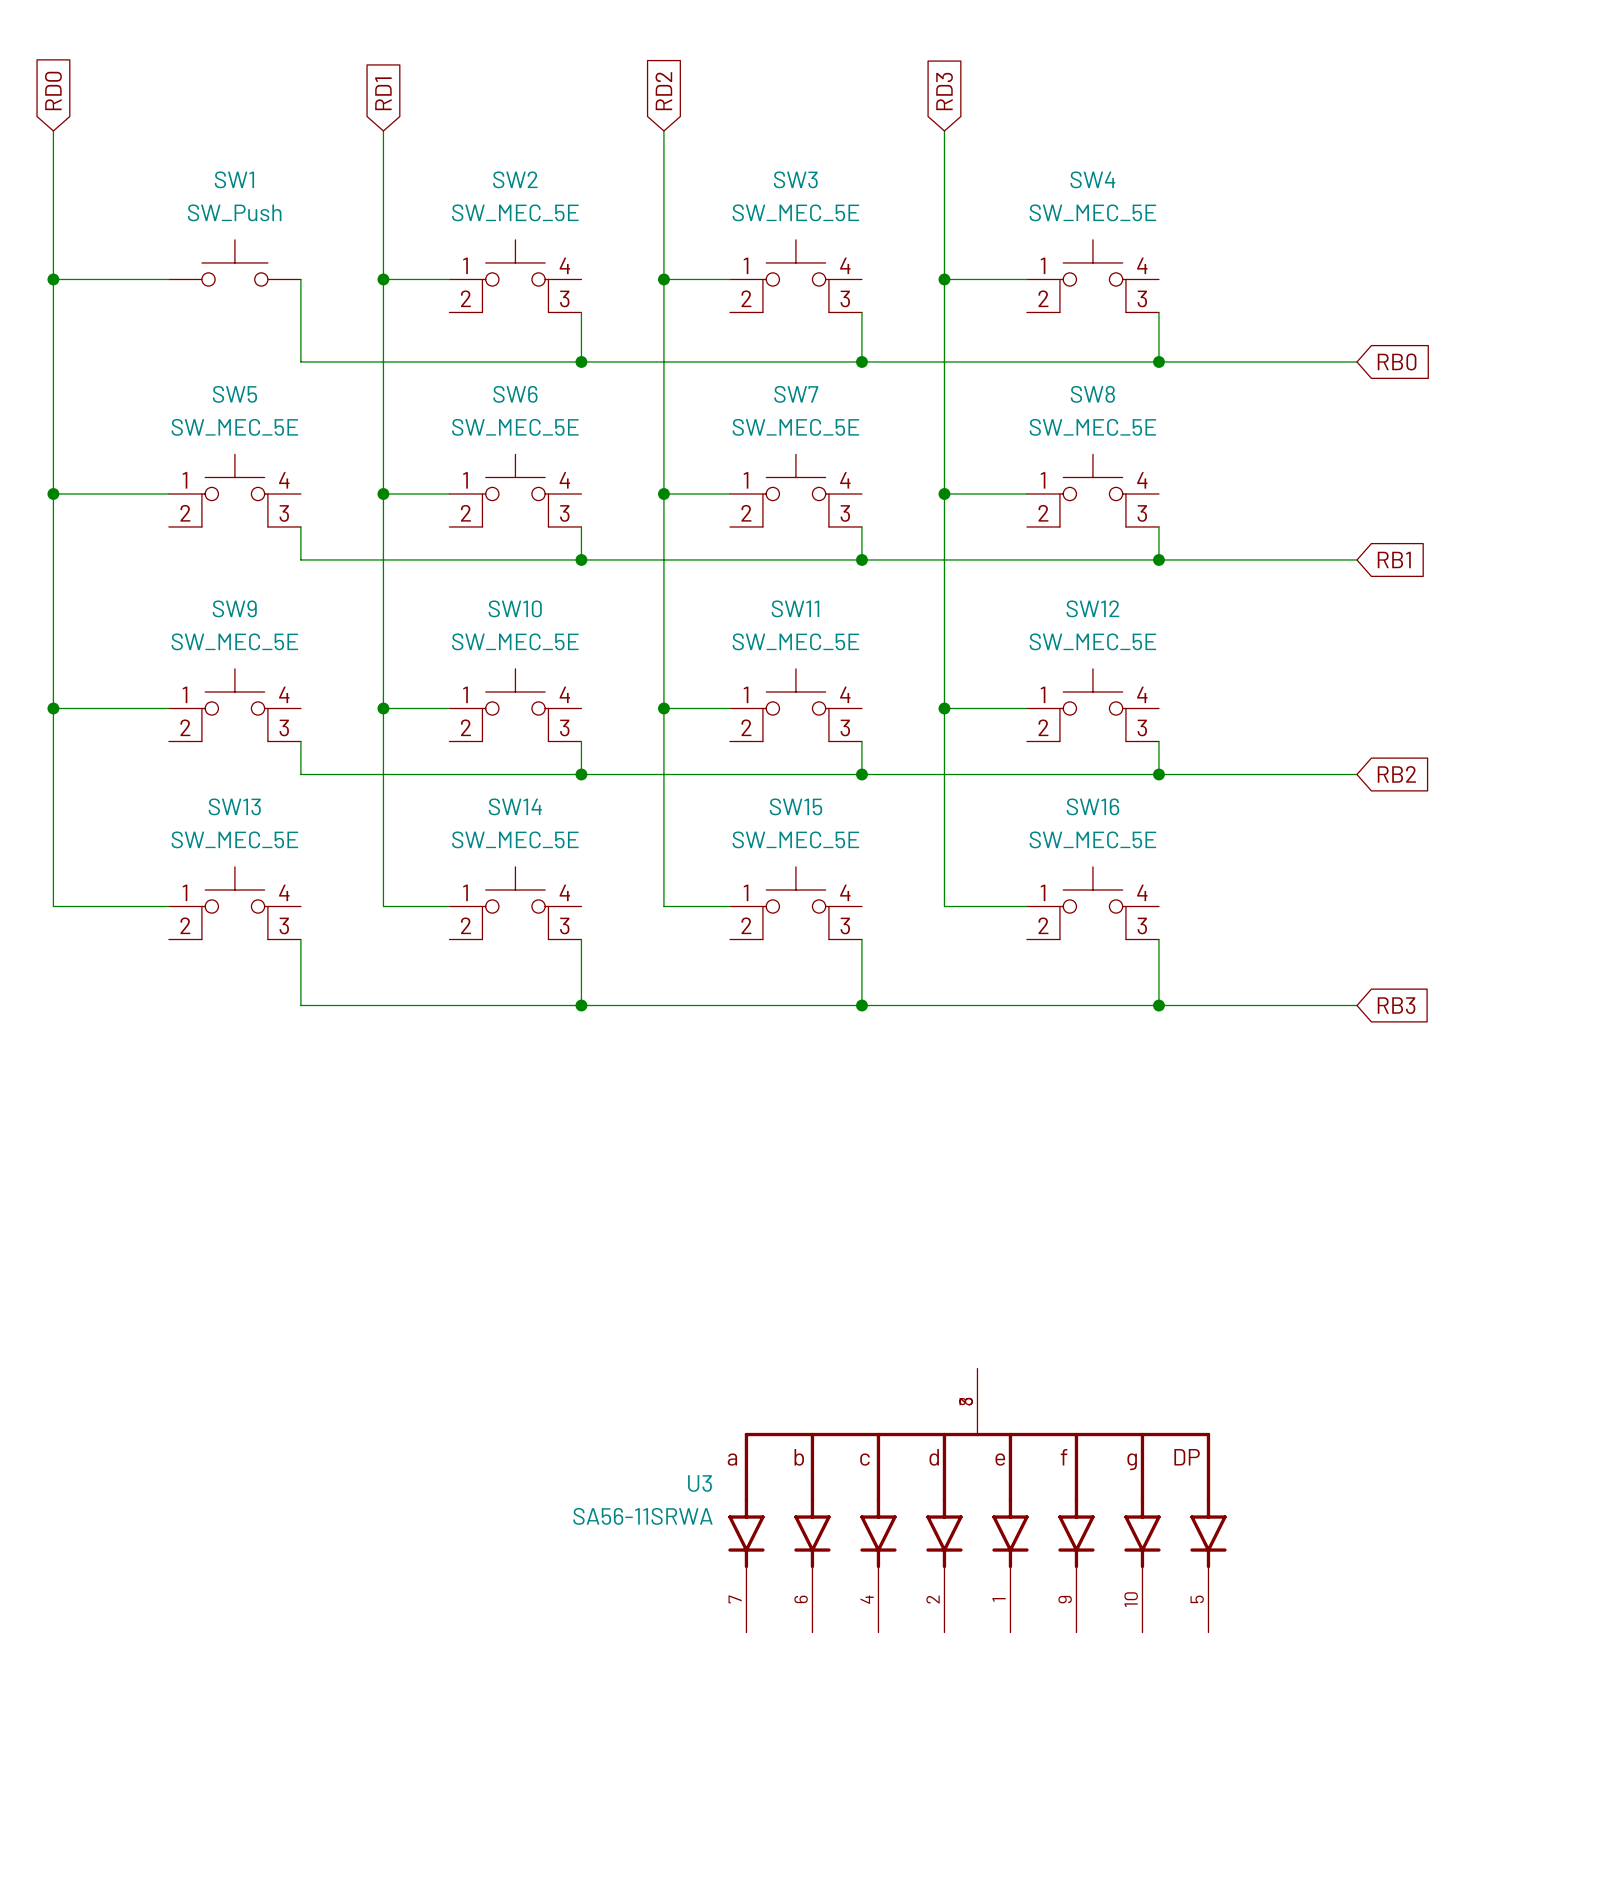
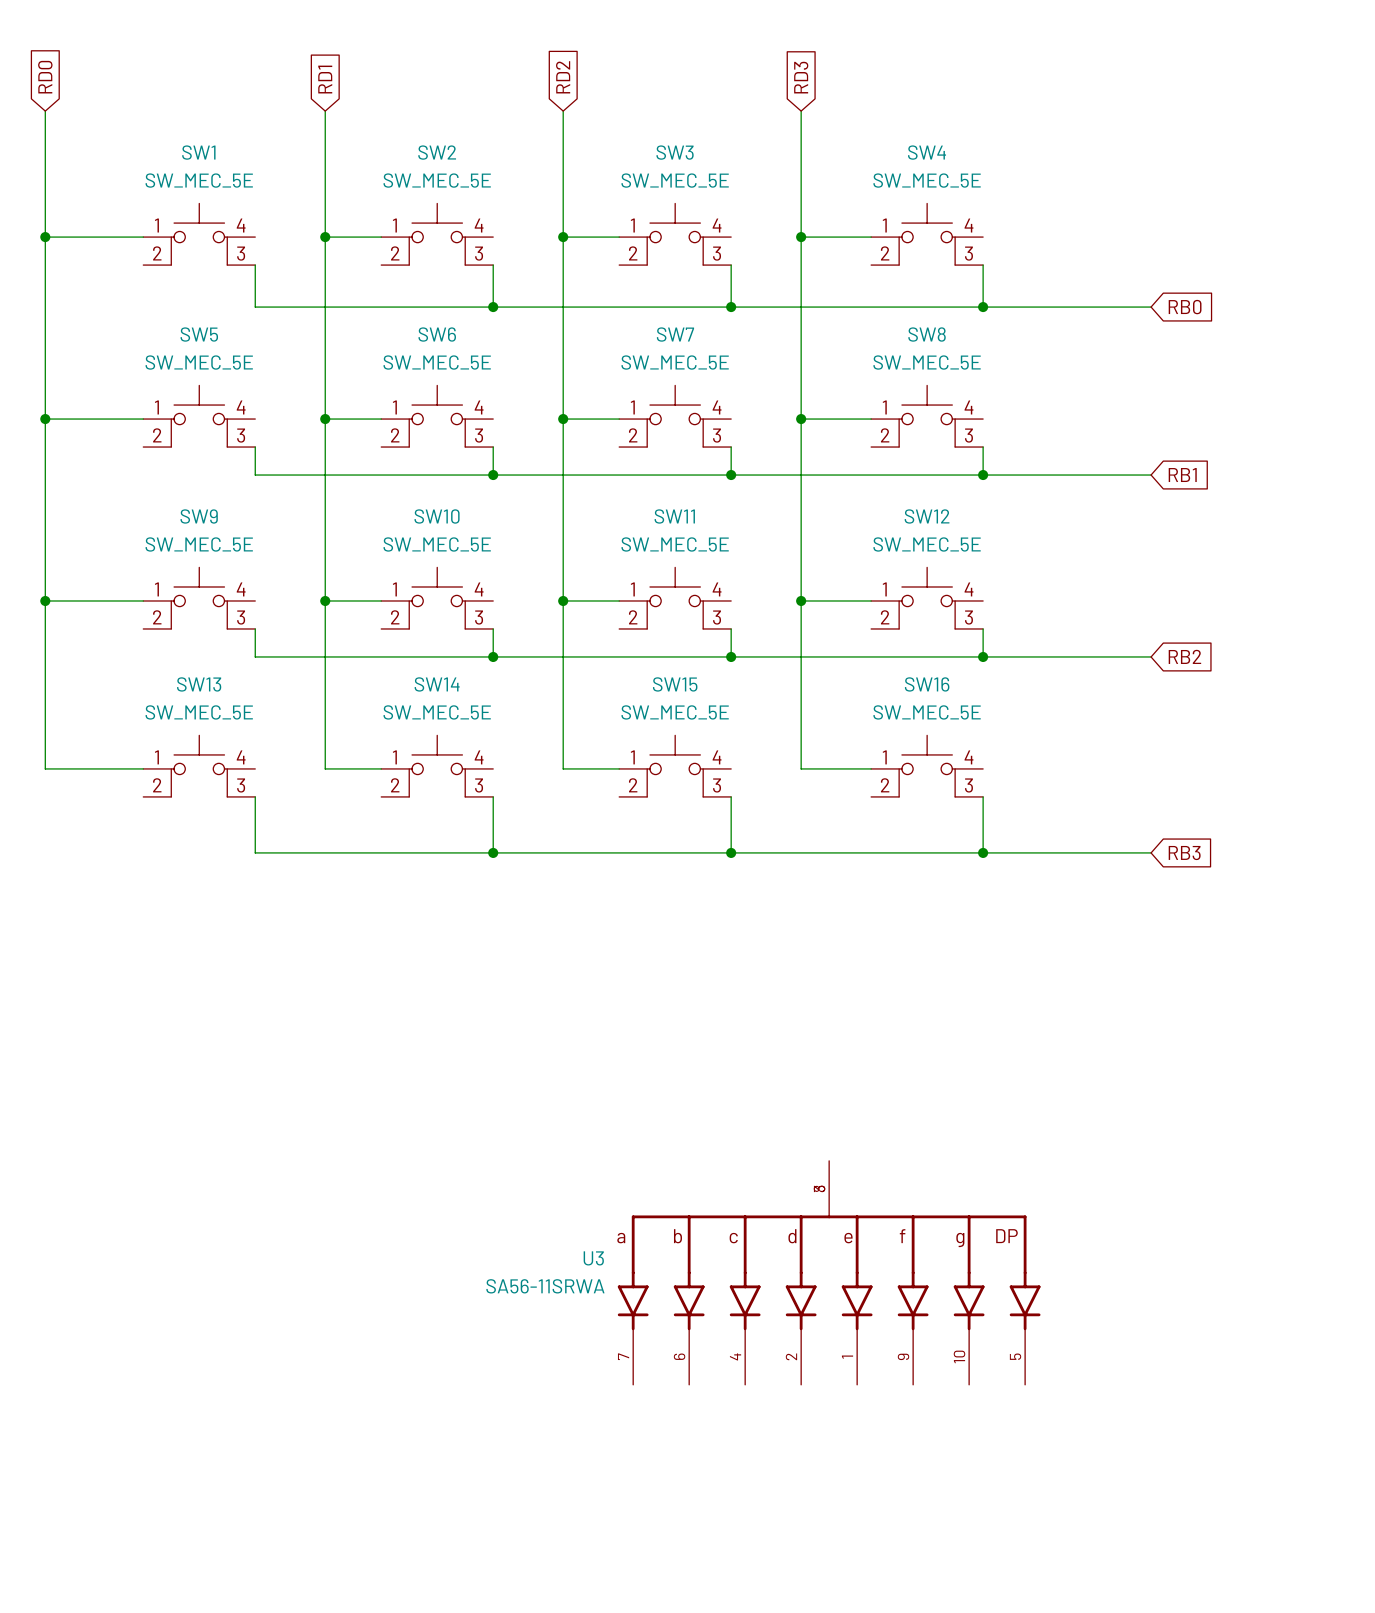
SW1 value: SW_Push (234, 212) -> SW_MEC_5E (199, 180)
SW1 symbol: [168, 239, 301, 287] -> [143, 203, 256, 266]
wire: (300, 279) (300, 312) -> none

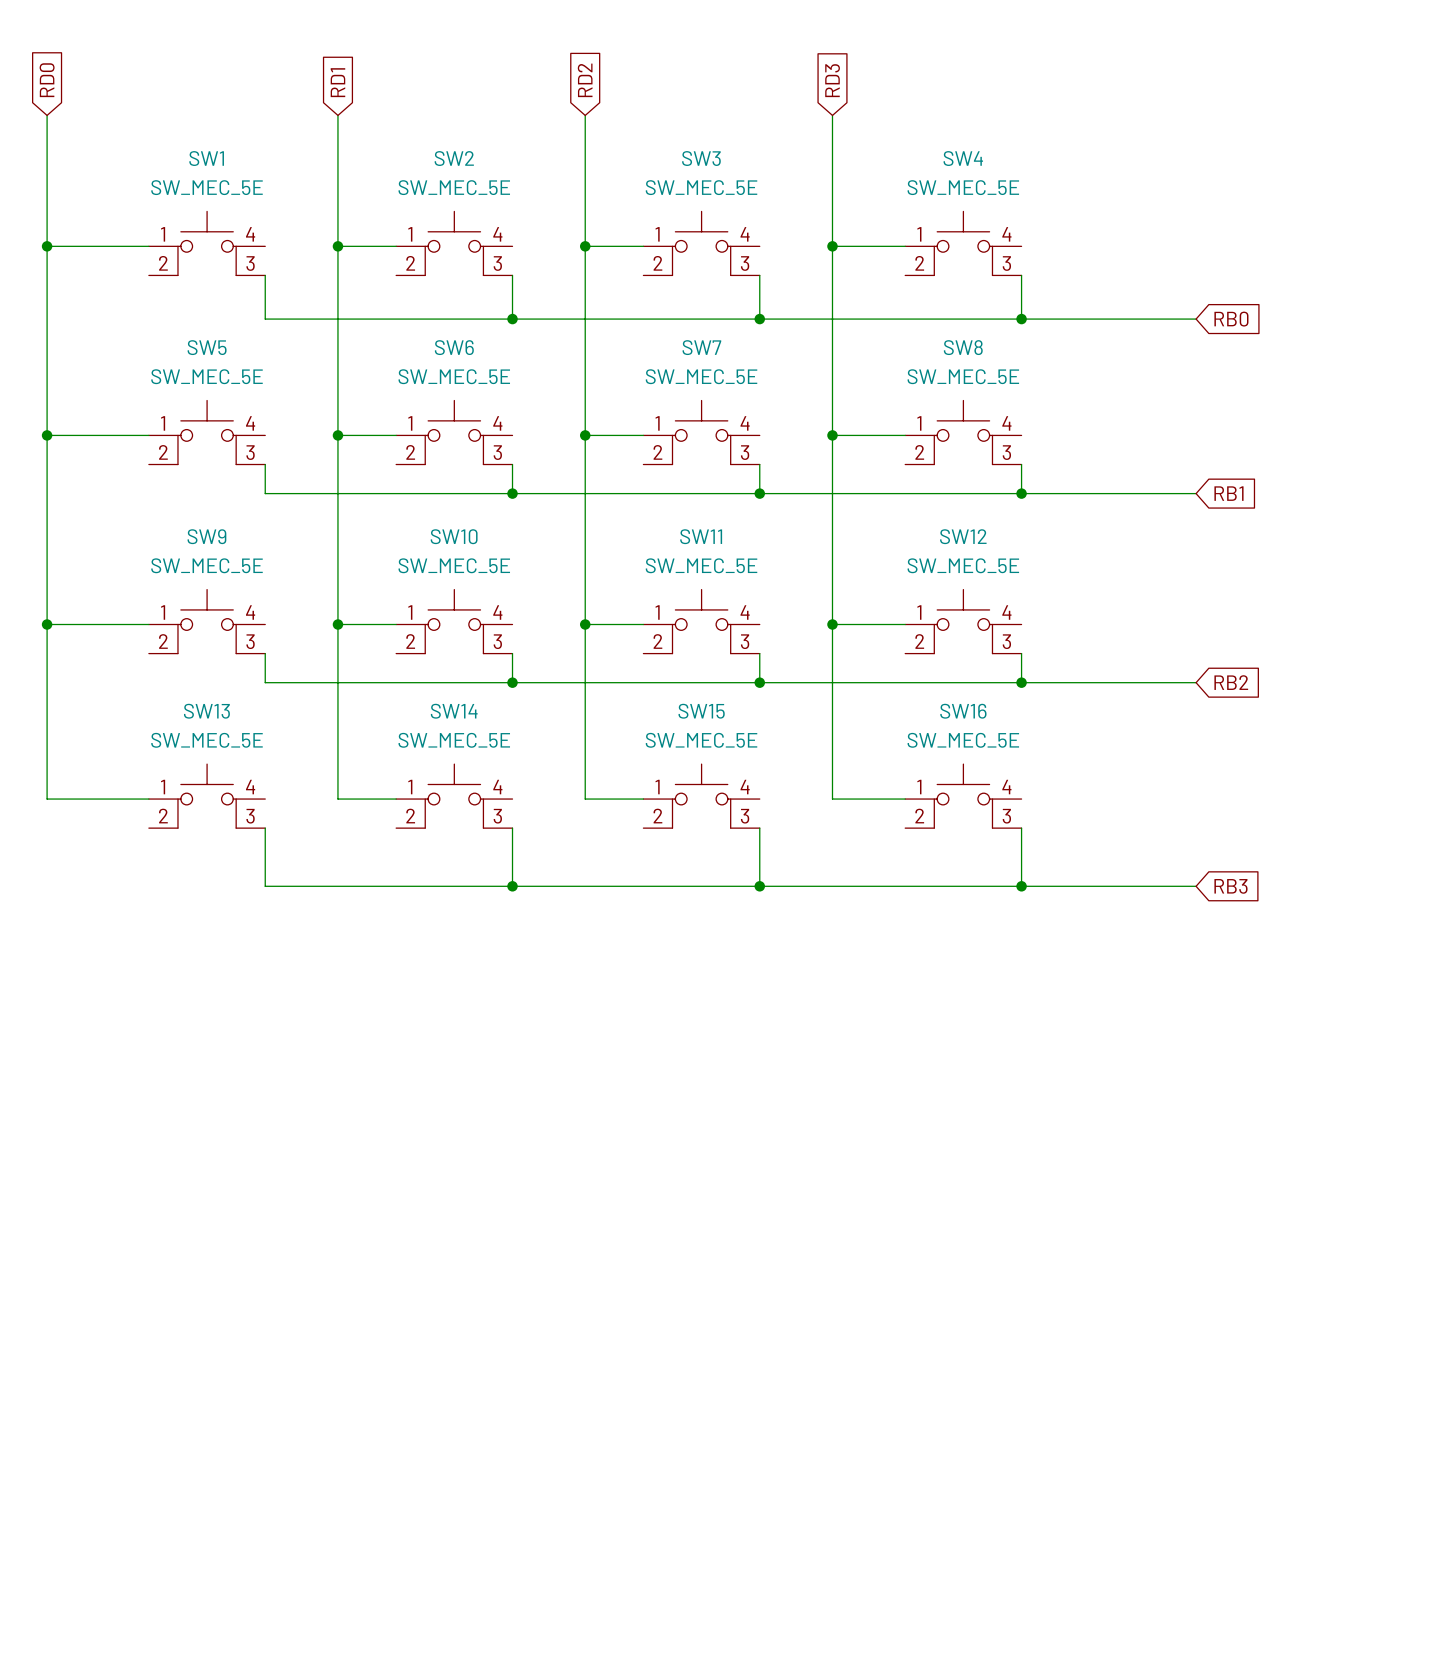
U3: SA56-11SRWA (829, 1272) -> none

